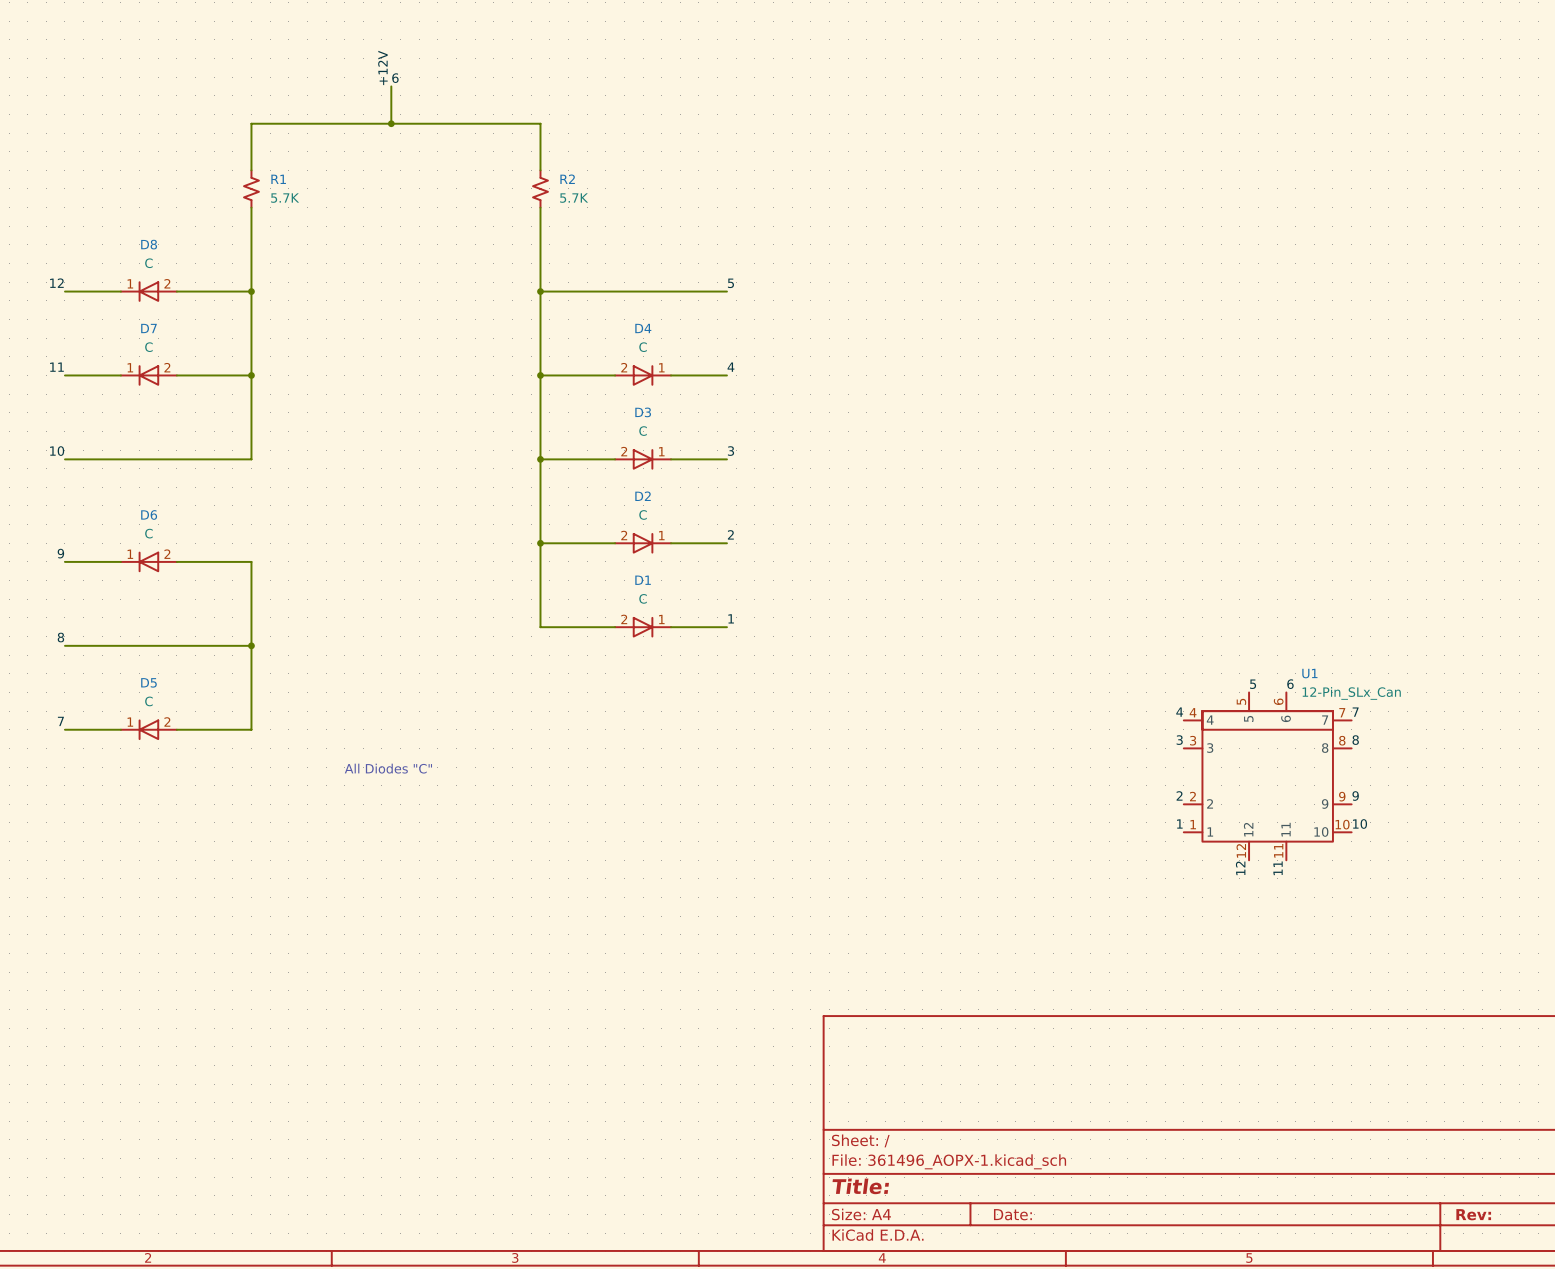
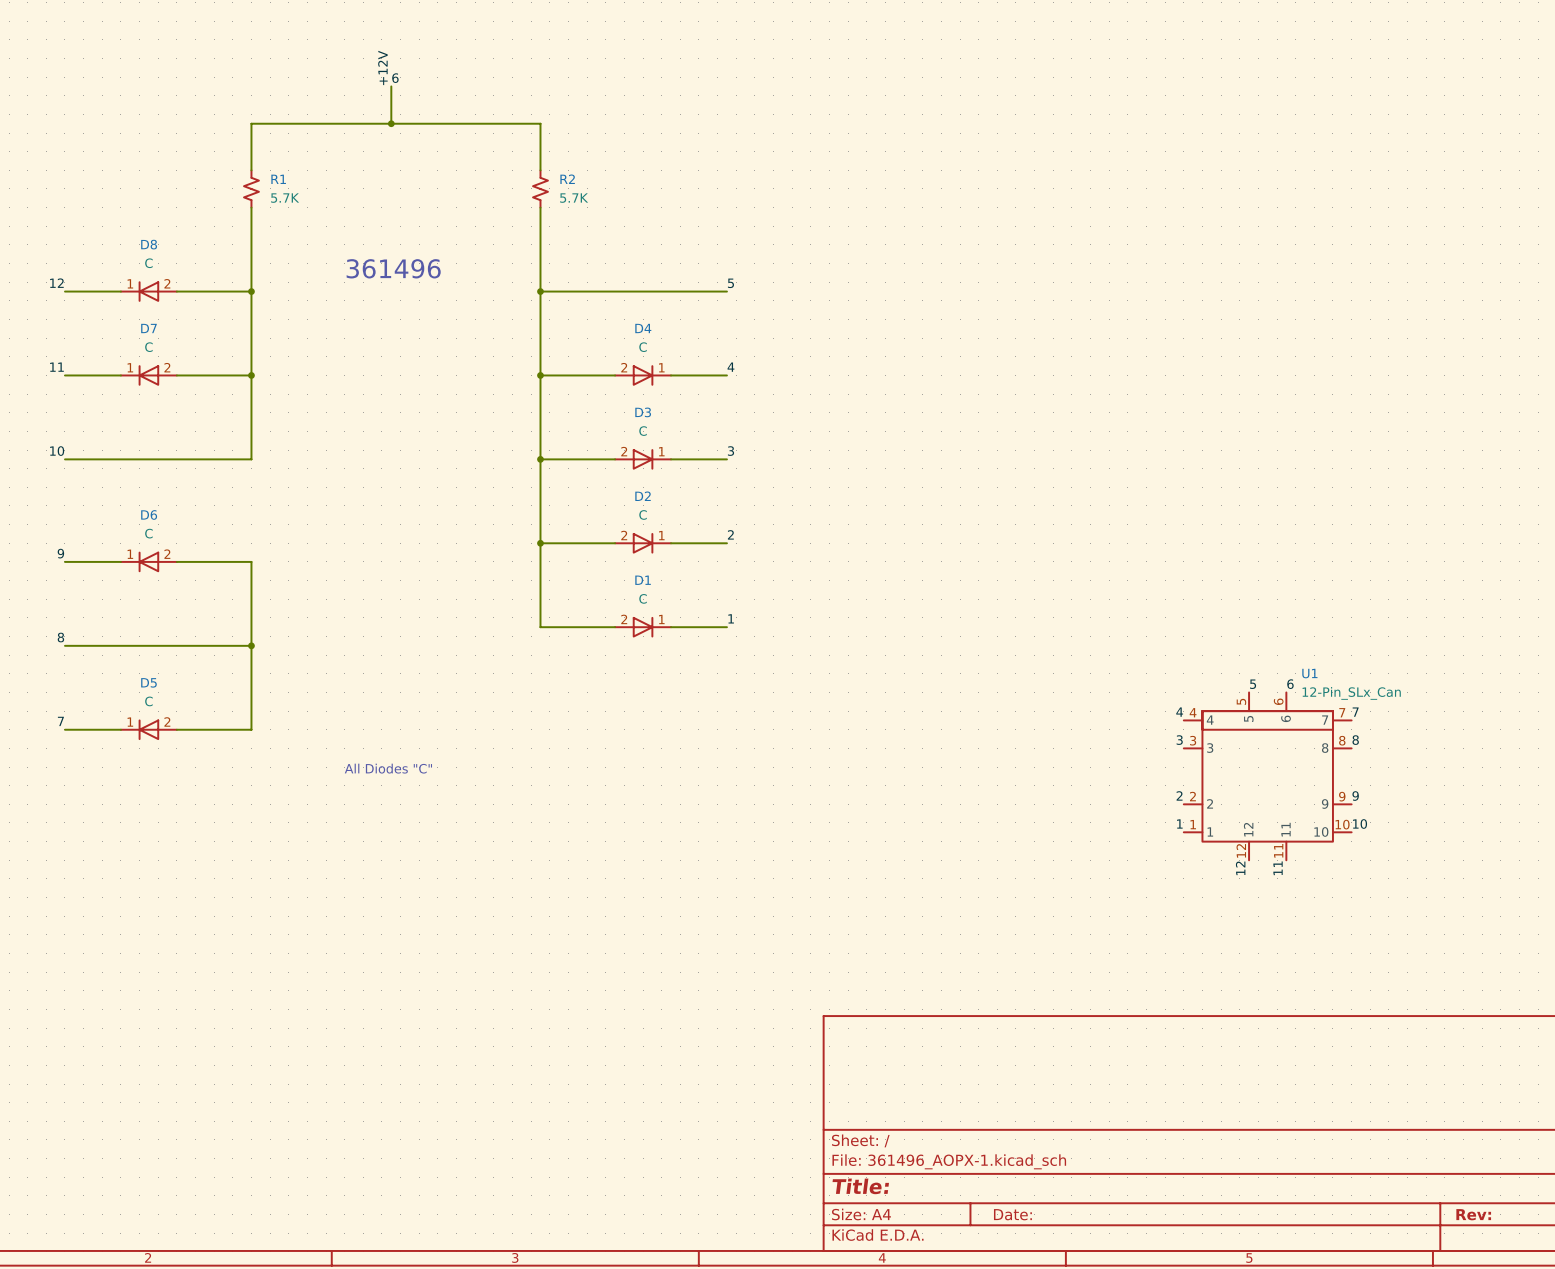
text: none -> 361496 (393, 268)

